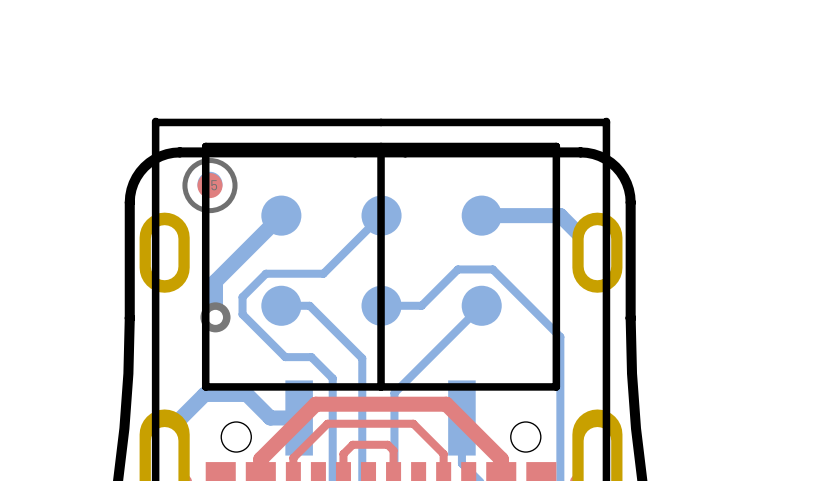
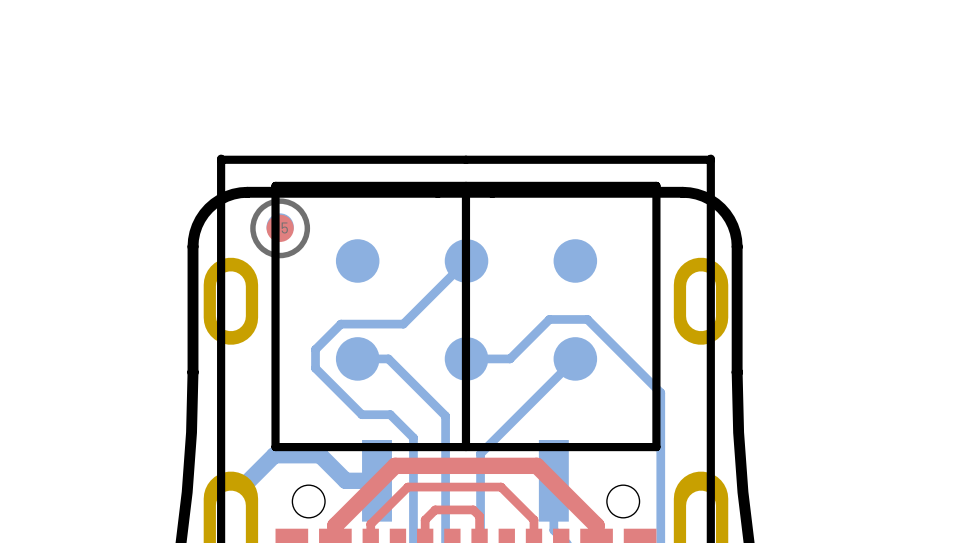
bottom track: (281, 215) (215, 281) (215, 317) -> none
bottom track: (481, 215) (560, 215) (597, 252) -> none
via: (215, 317) -> none

